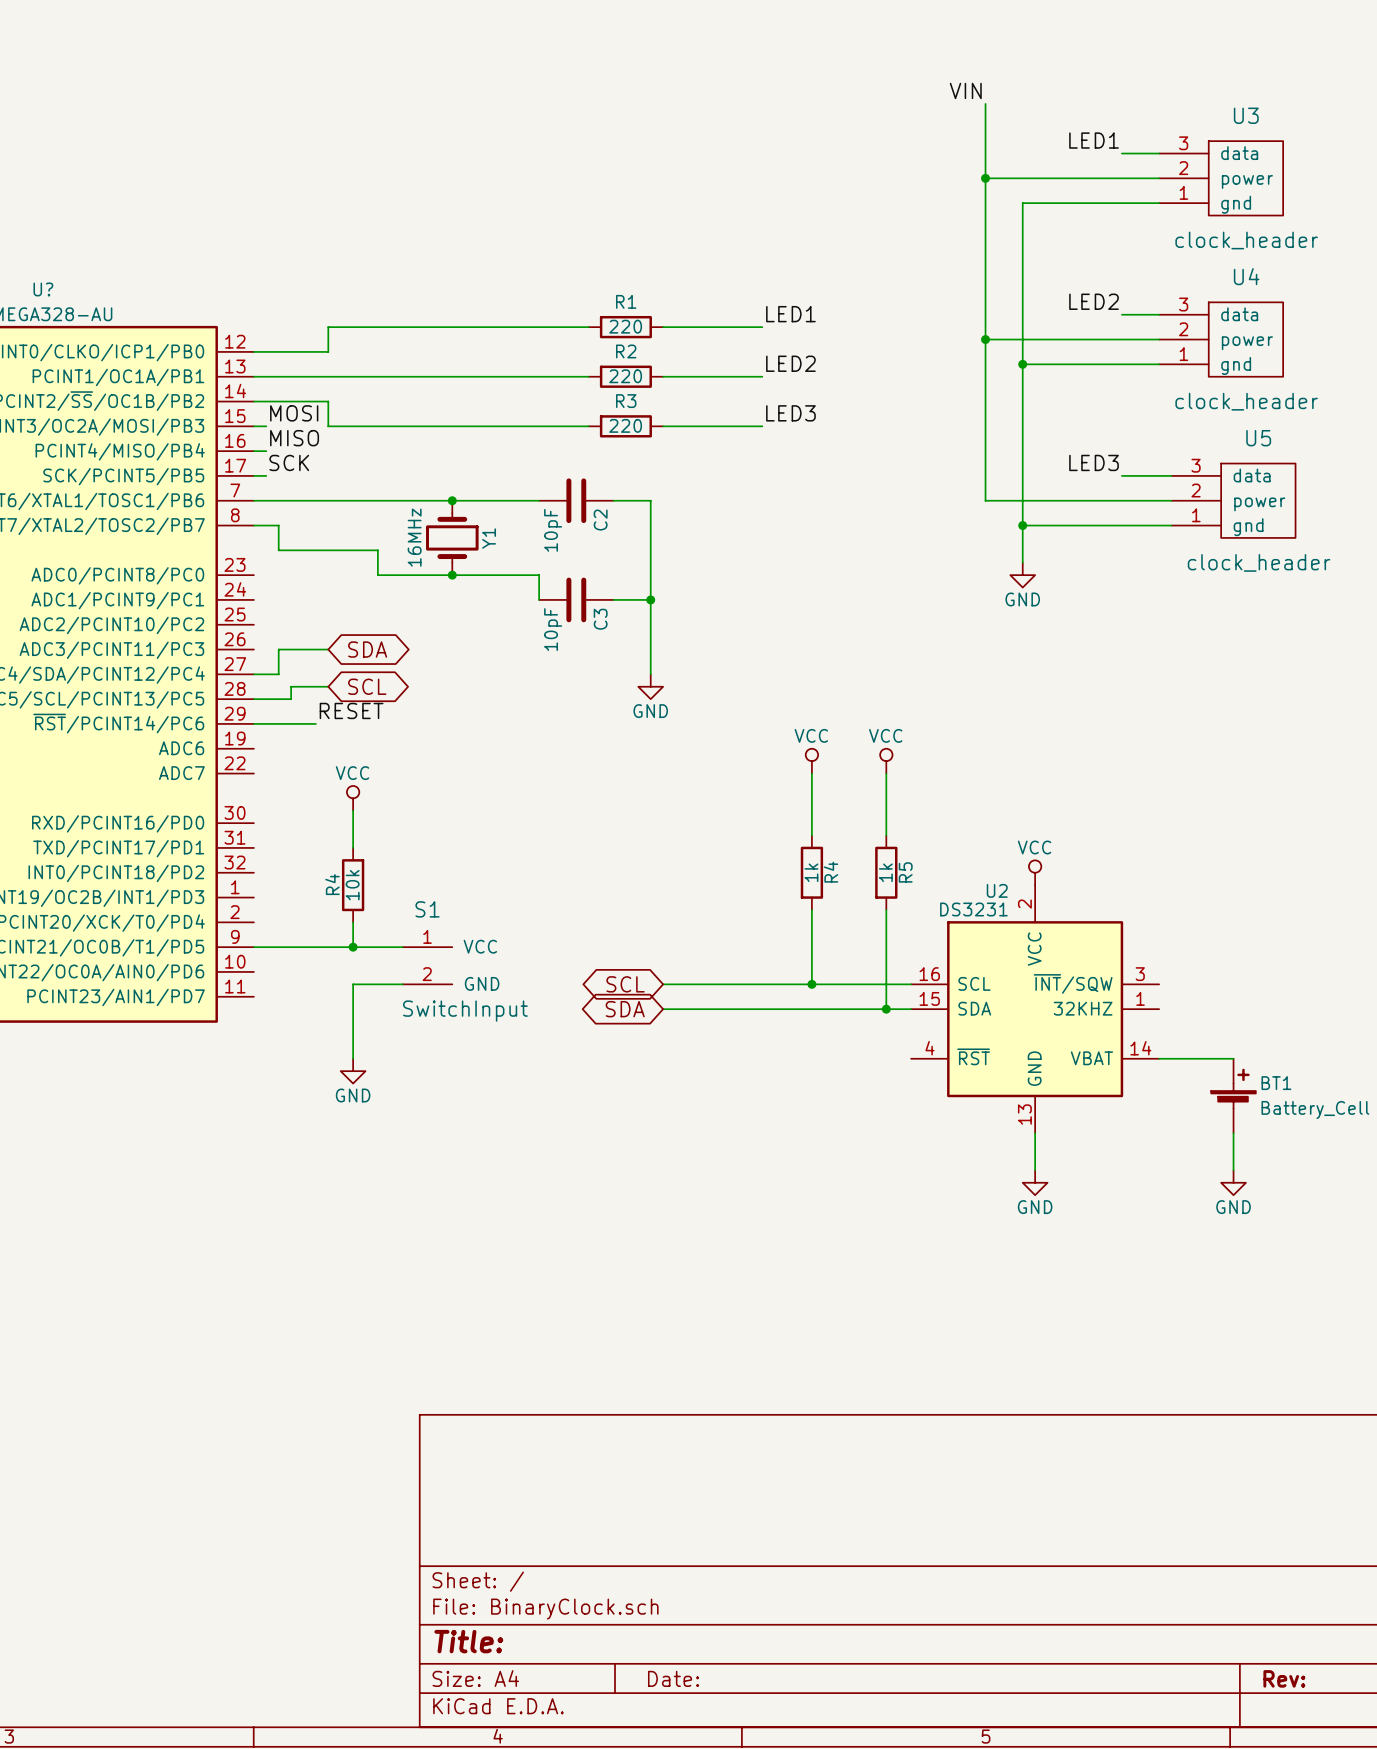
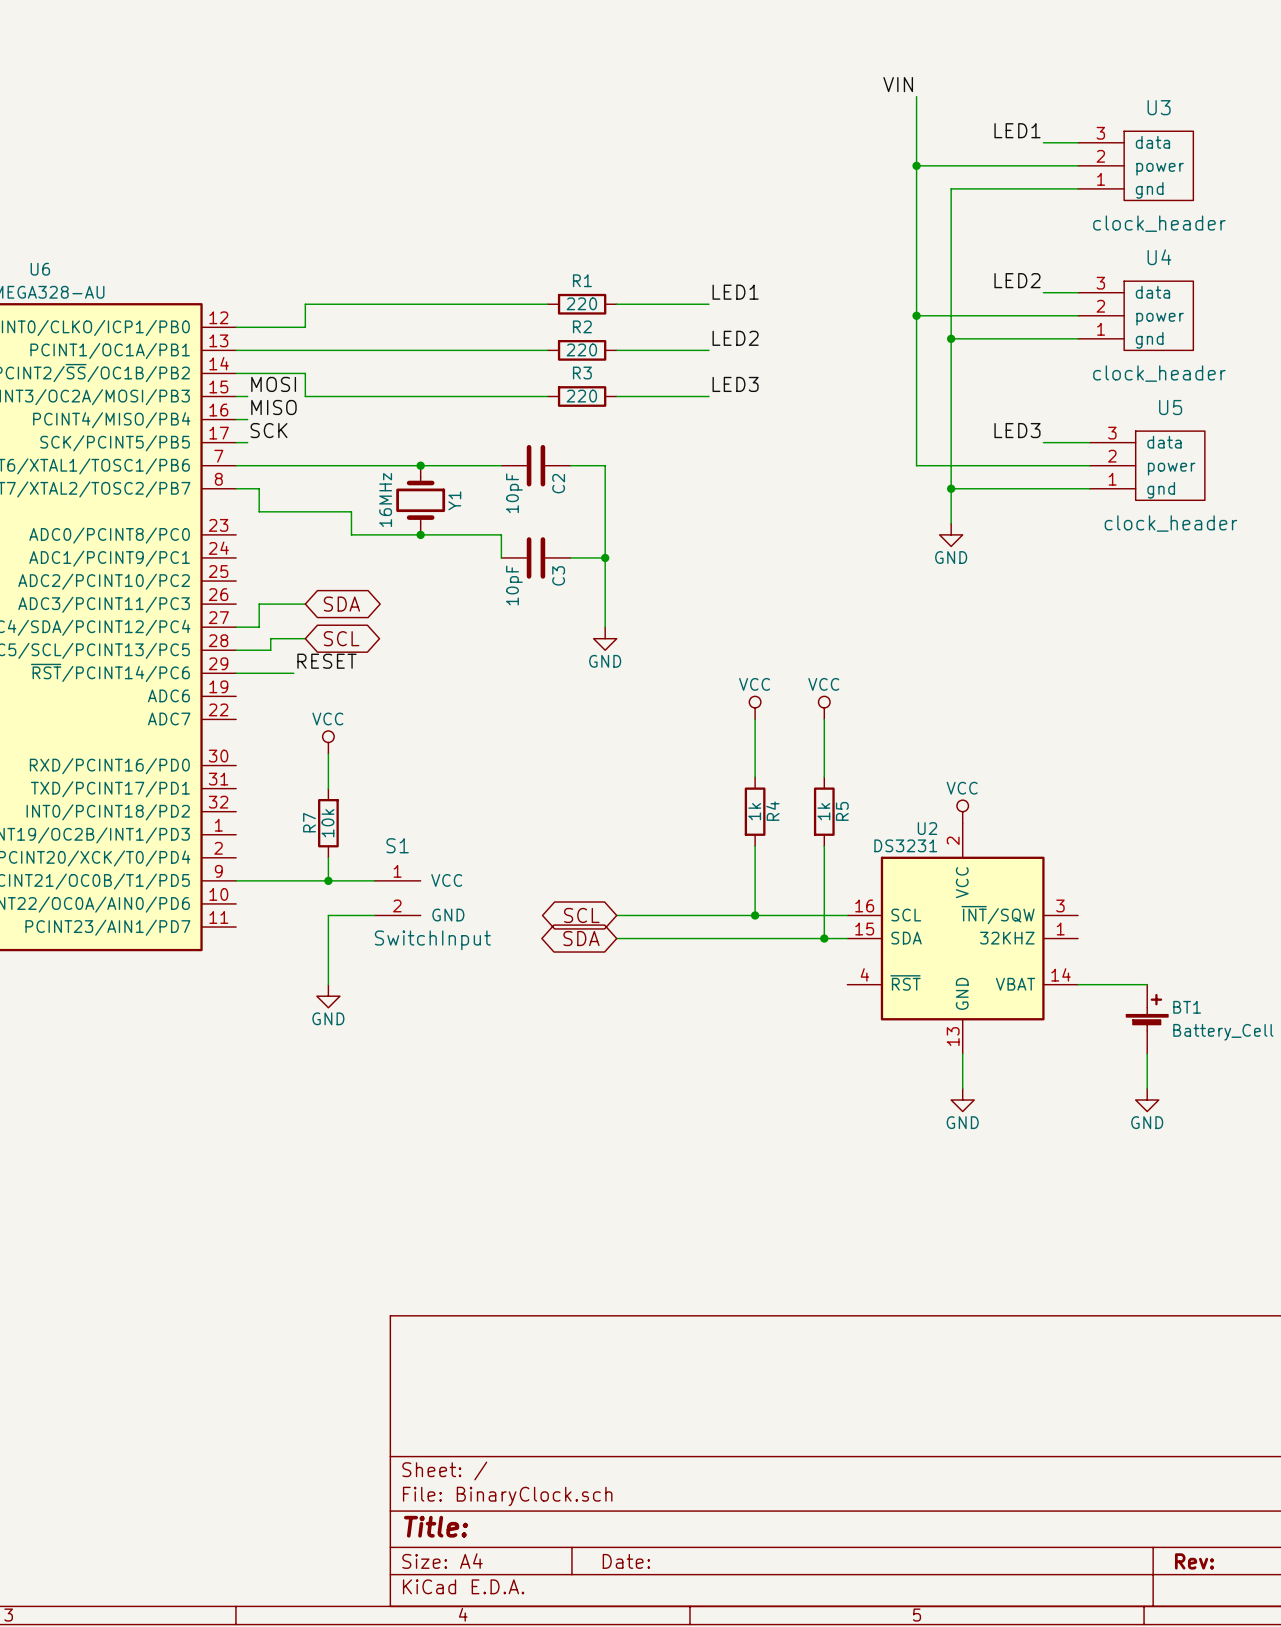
U? name: U? (43, 289) -> U6 (40, 269)
R4 name: R4 (332, 884) -> R7 (309, 822)

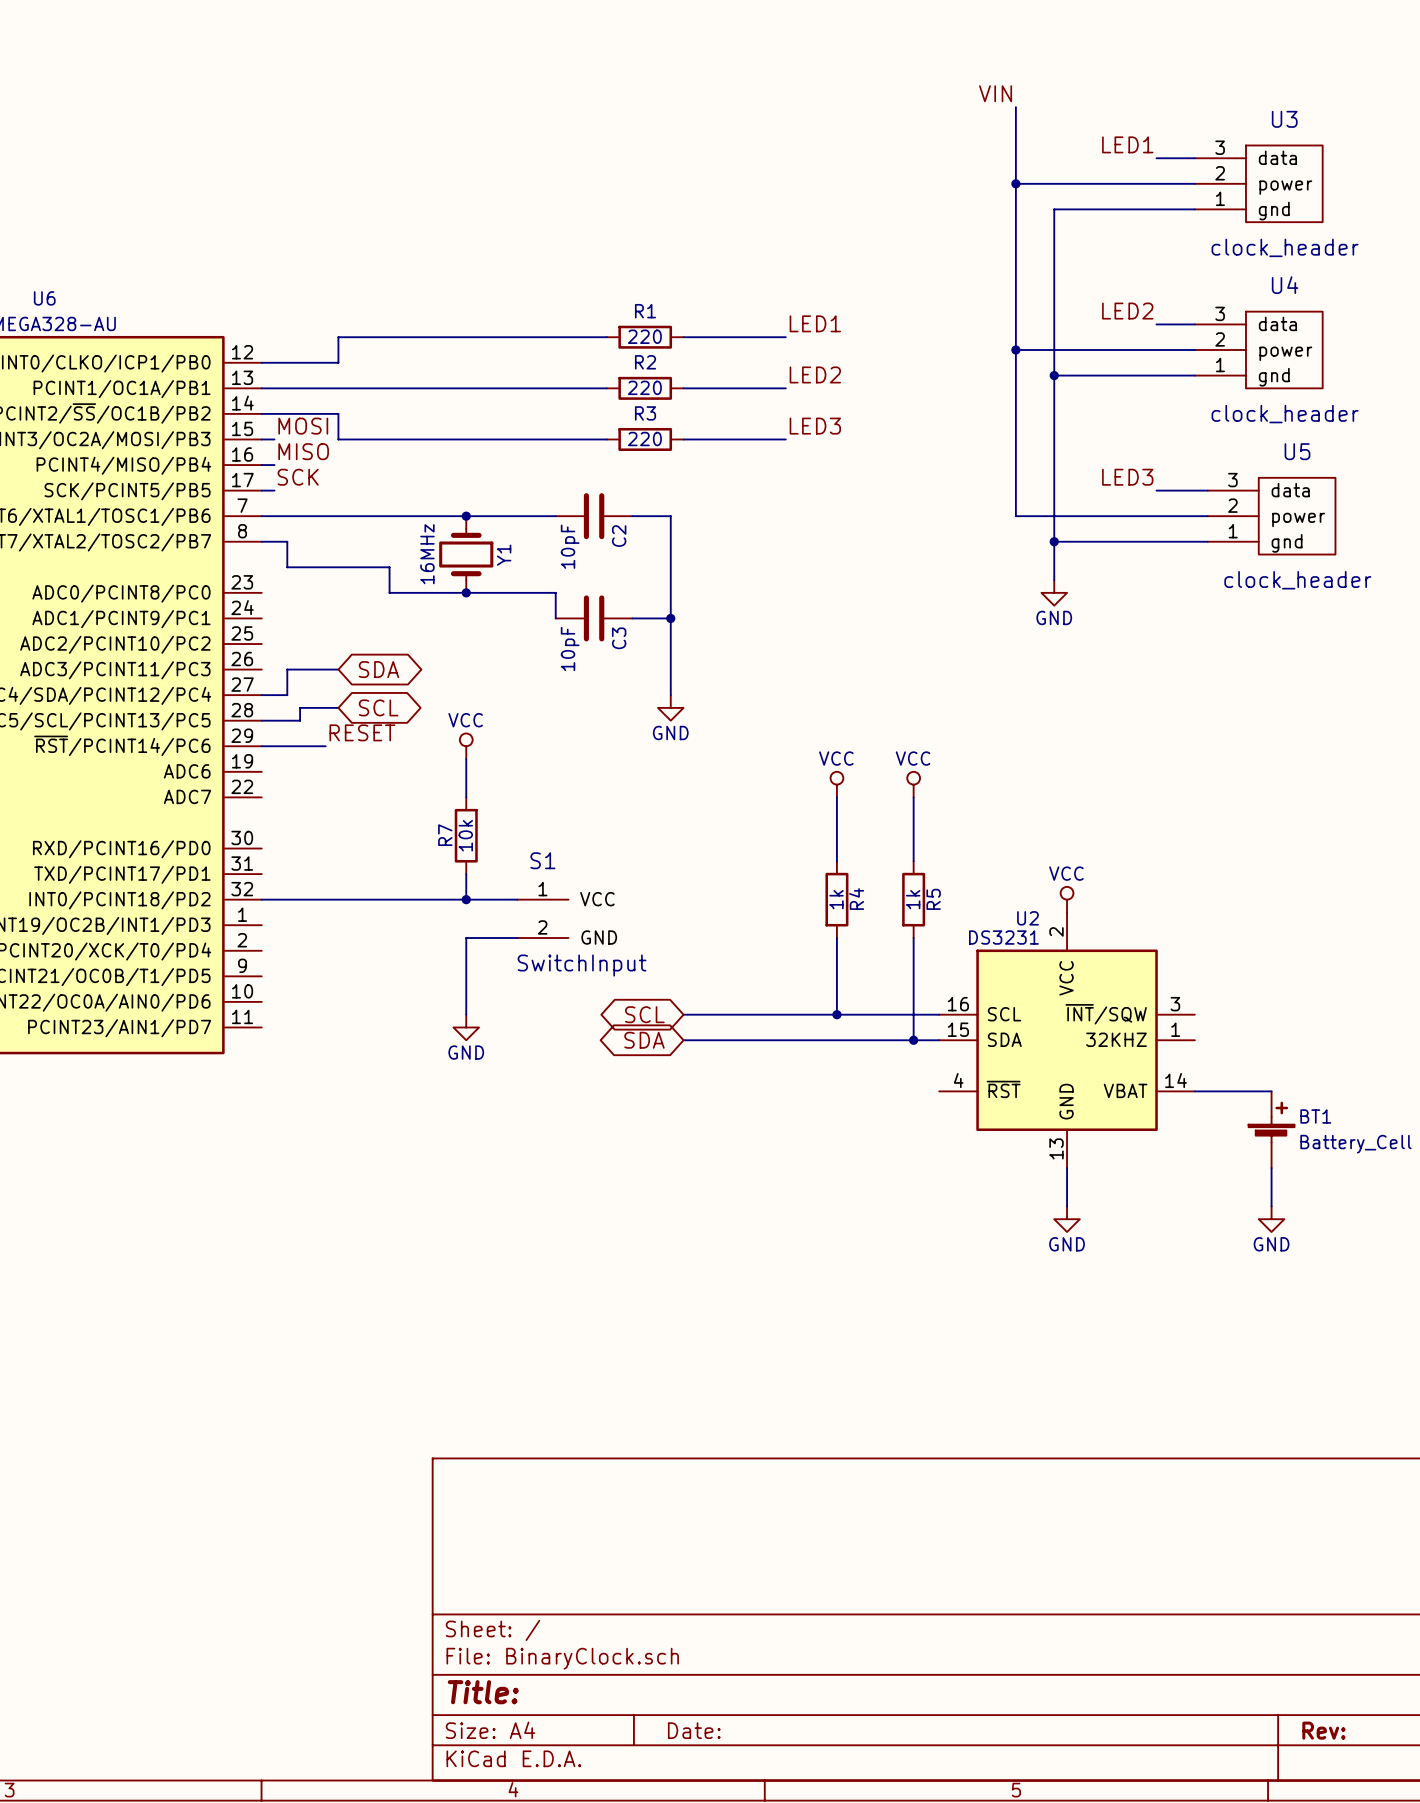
power symbol position: VCC (328, 742) -> VCC (466, 746)
wire: (328, 754) (328, 788) -> (466, 759) (466, 797)
wire: none -> (261, 899) (517, 899)
junction: none -> (466, 899)
R7 position: (328, 823) -> (466, 835)
wire: (328, 857) (328, 880) -> (466, 874) (466, 899)
wire: (236, 880) (374, 880) -> none
junction: (328, 880) -> none
S1 position: (397, 898) -> (542, 918)
wire: (374, 915) (328, 915) (328, 984) -> (517, 938) (466, 938) (466, 1014)
power symbol position: GND (328, 996) -> GND (466, 1027)

